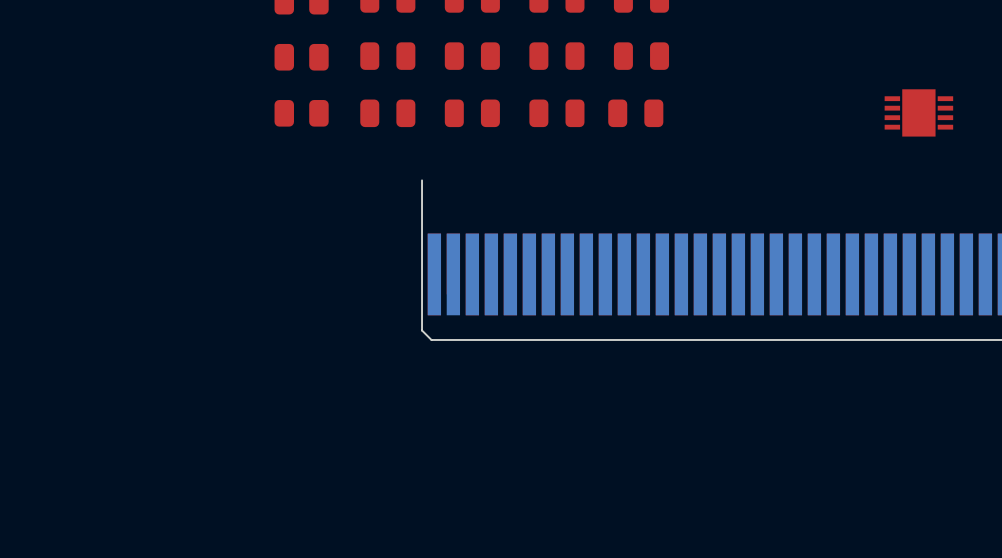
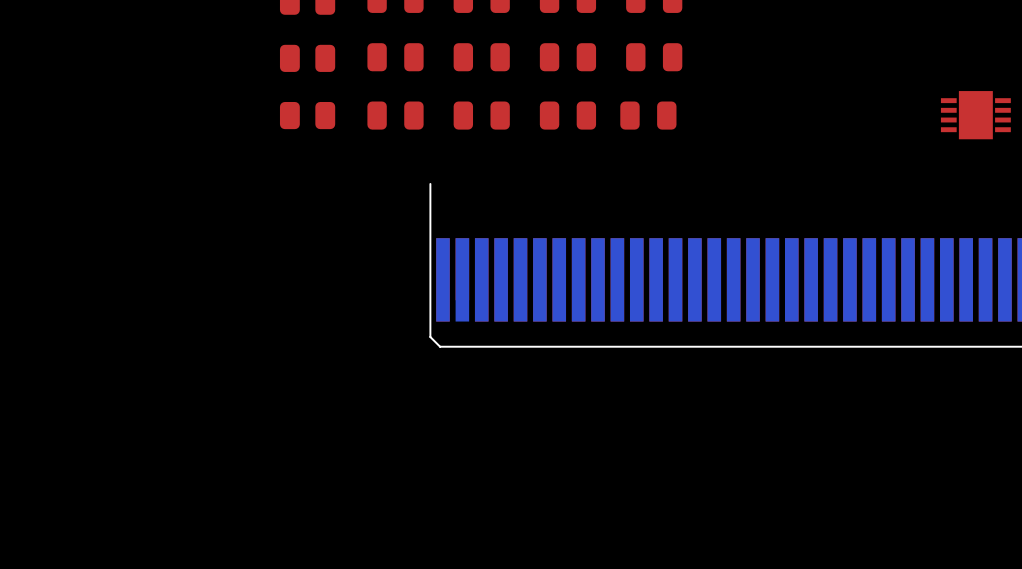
part position: (918, 112) -> (975, 115)

